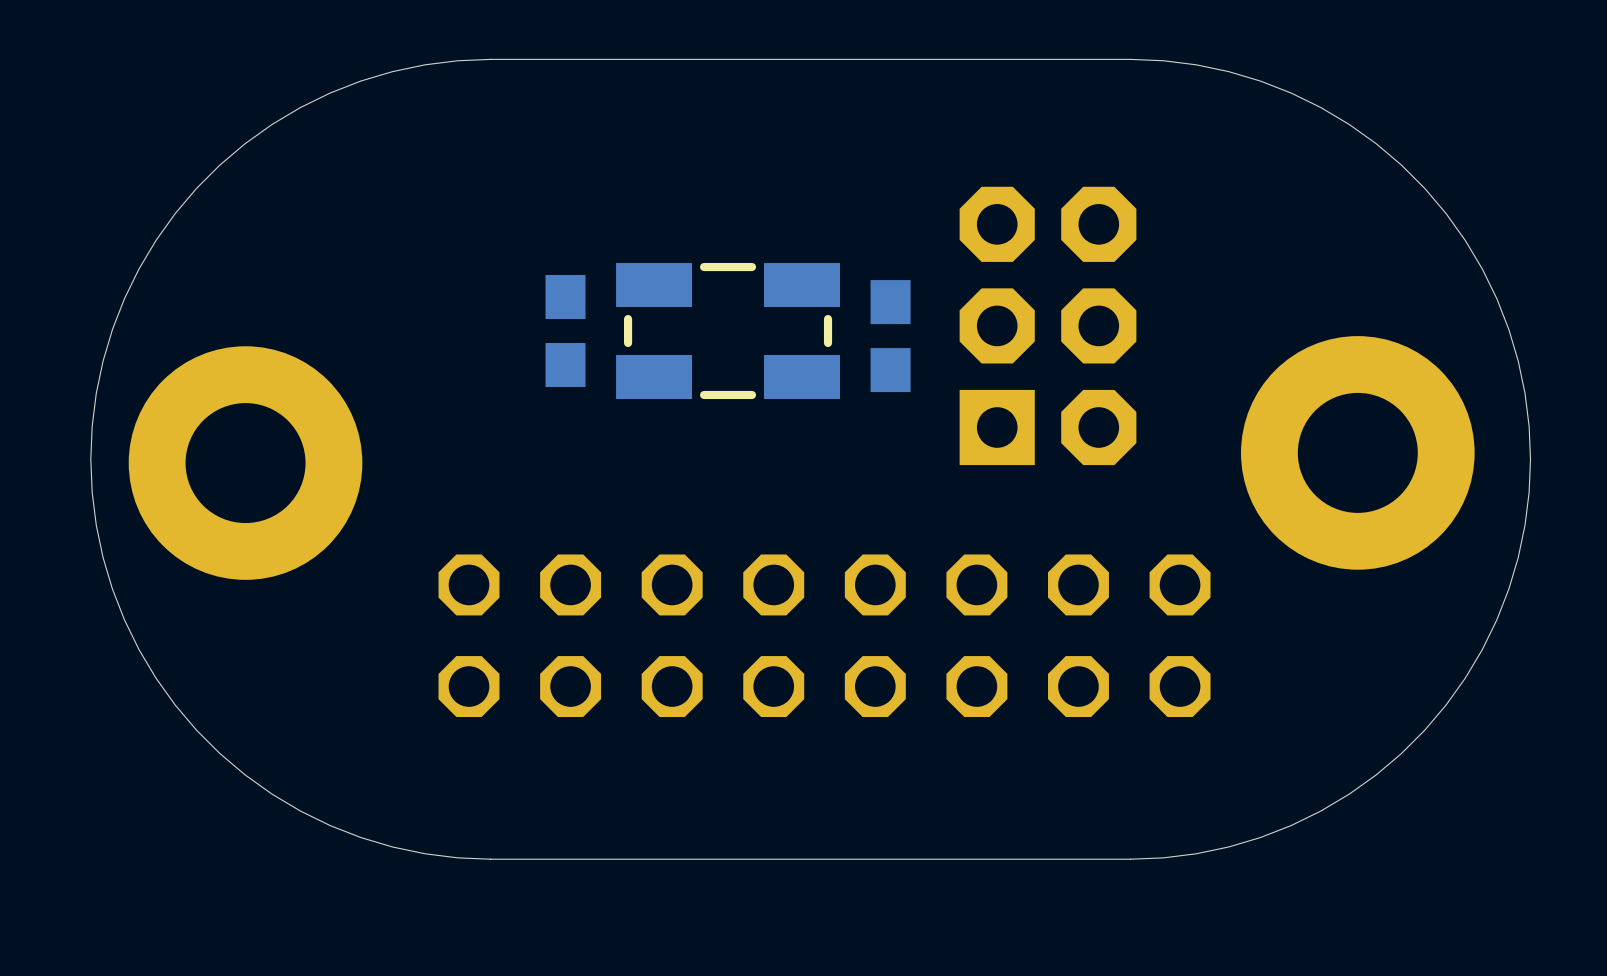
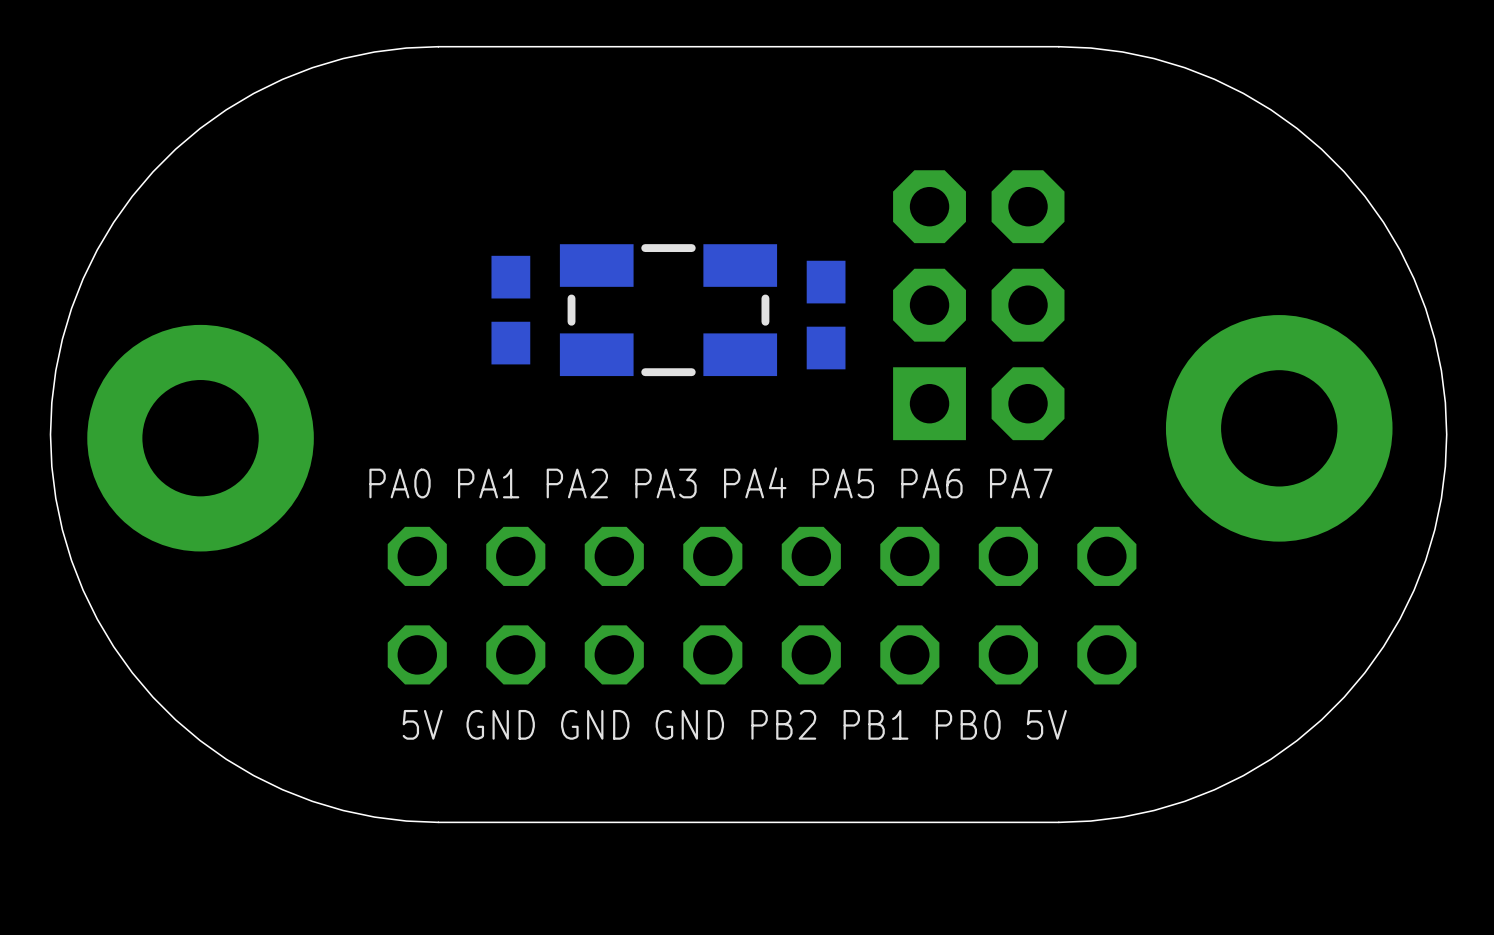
text: none -> PA0 PA1 PA2 PA3 PA4 PA5 PA6 PA7 (710, 482)
text: none -> 5V GND GND GND PB2 PB1 PB0 5V (734, 724)

